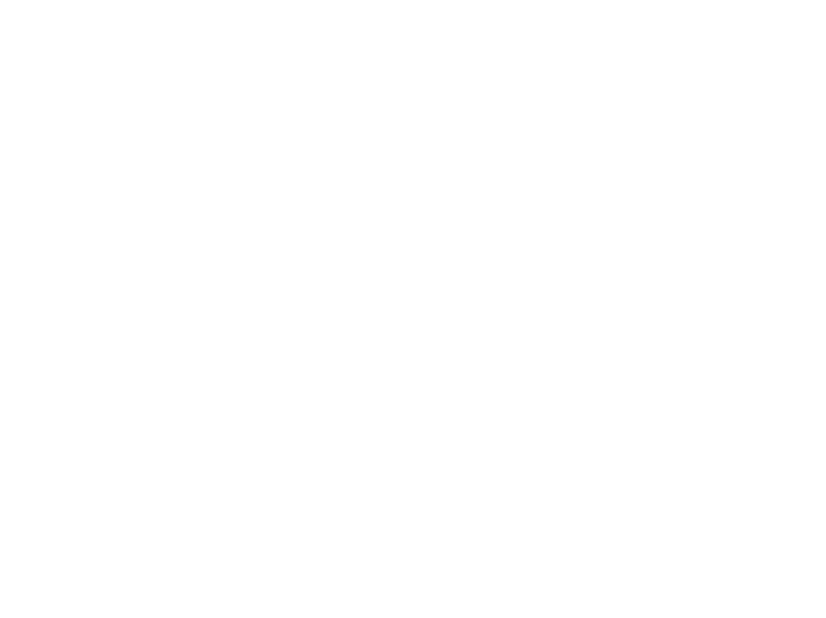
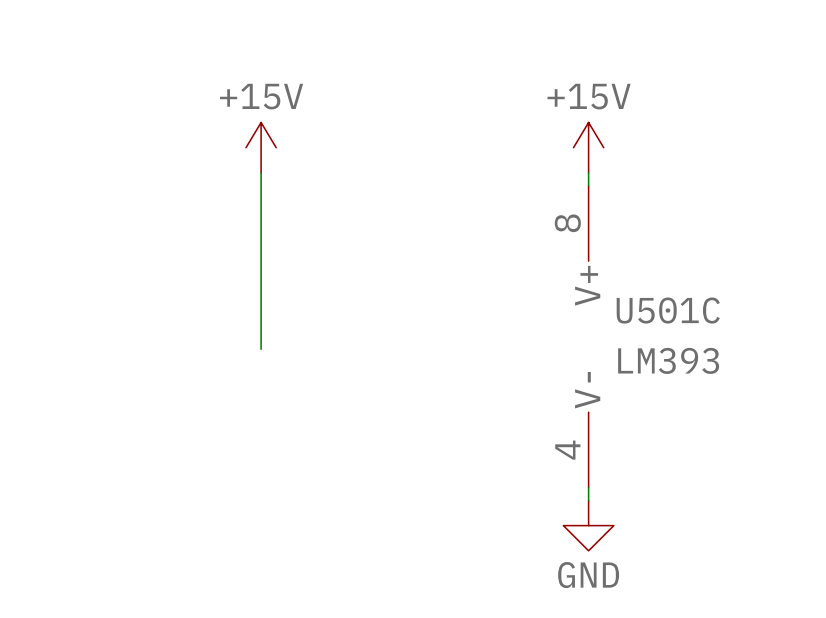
power symbol: none -> +15V (261, 147)
power symbol: none -> +15V (588, 147)
wire: none -> (261, 172) (261, 349)
wire: none -> (588, 172) (588, 185)
U501C: none -> LM393 (588, 336)
wire: none -> (588, 487) (588, 500)
power symbol: none -> GND (588, 525)

